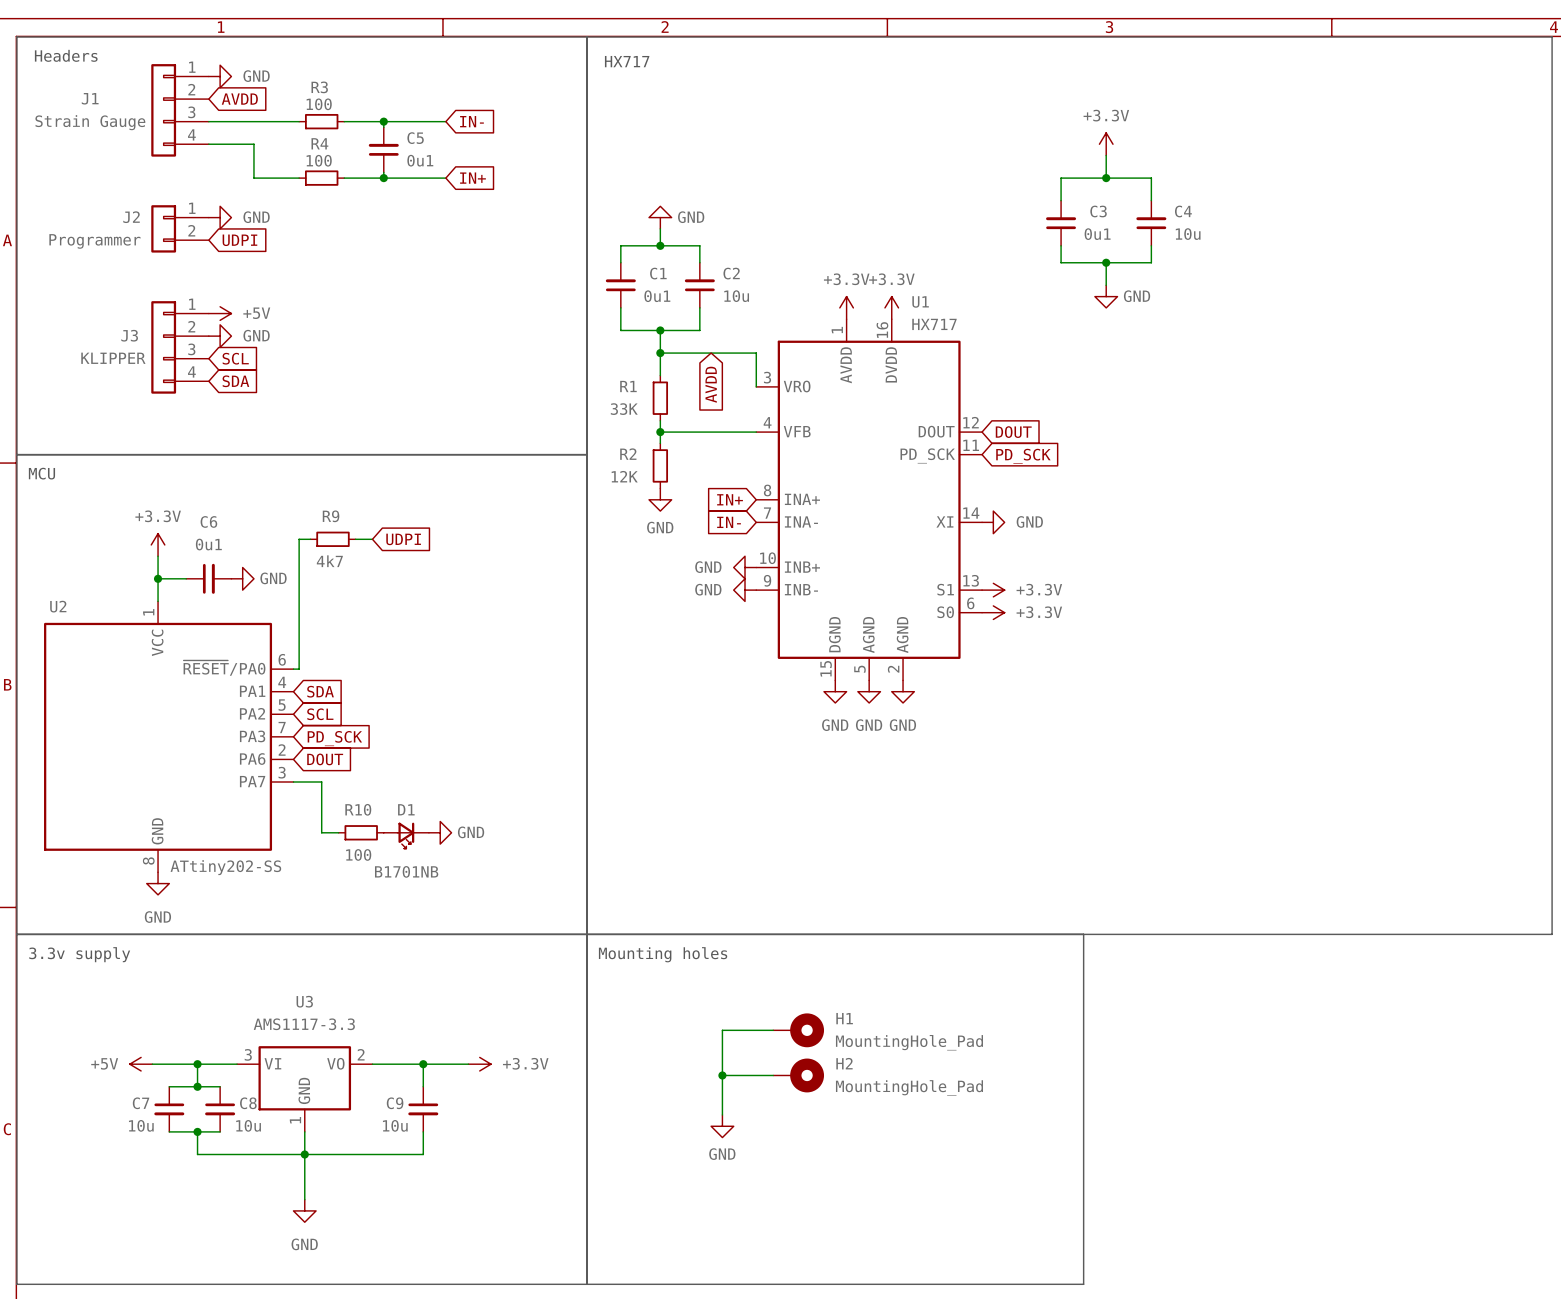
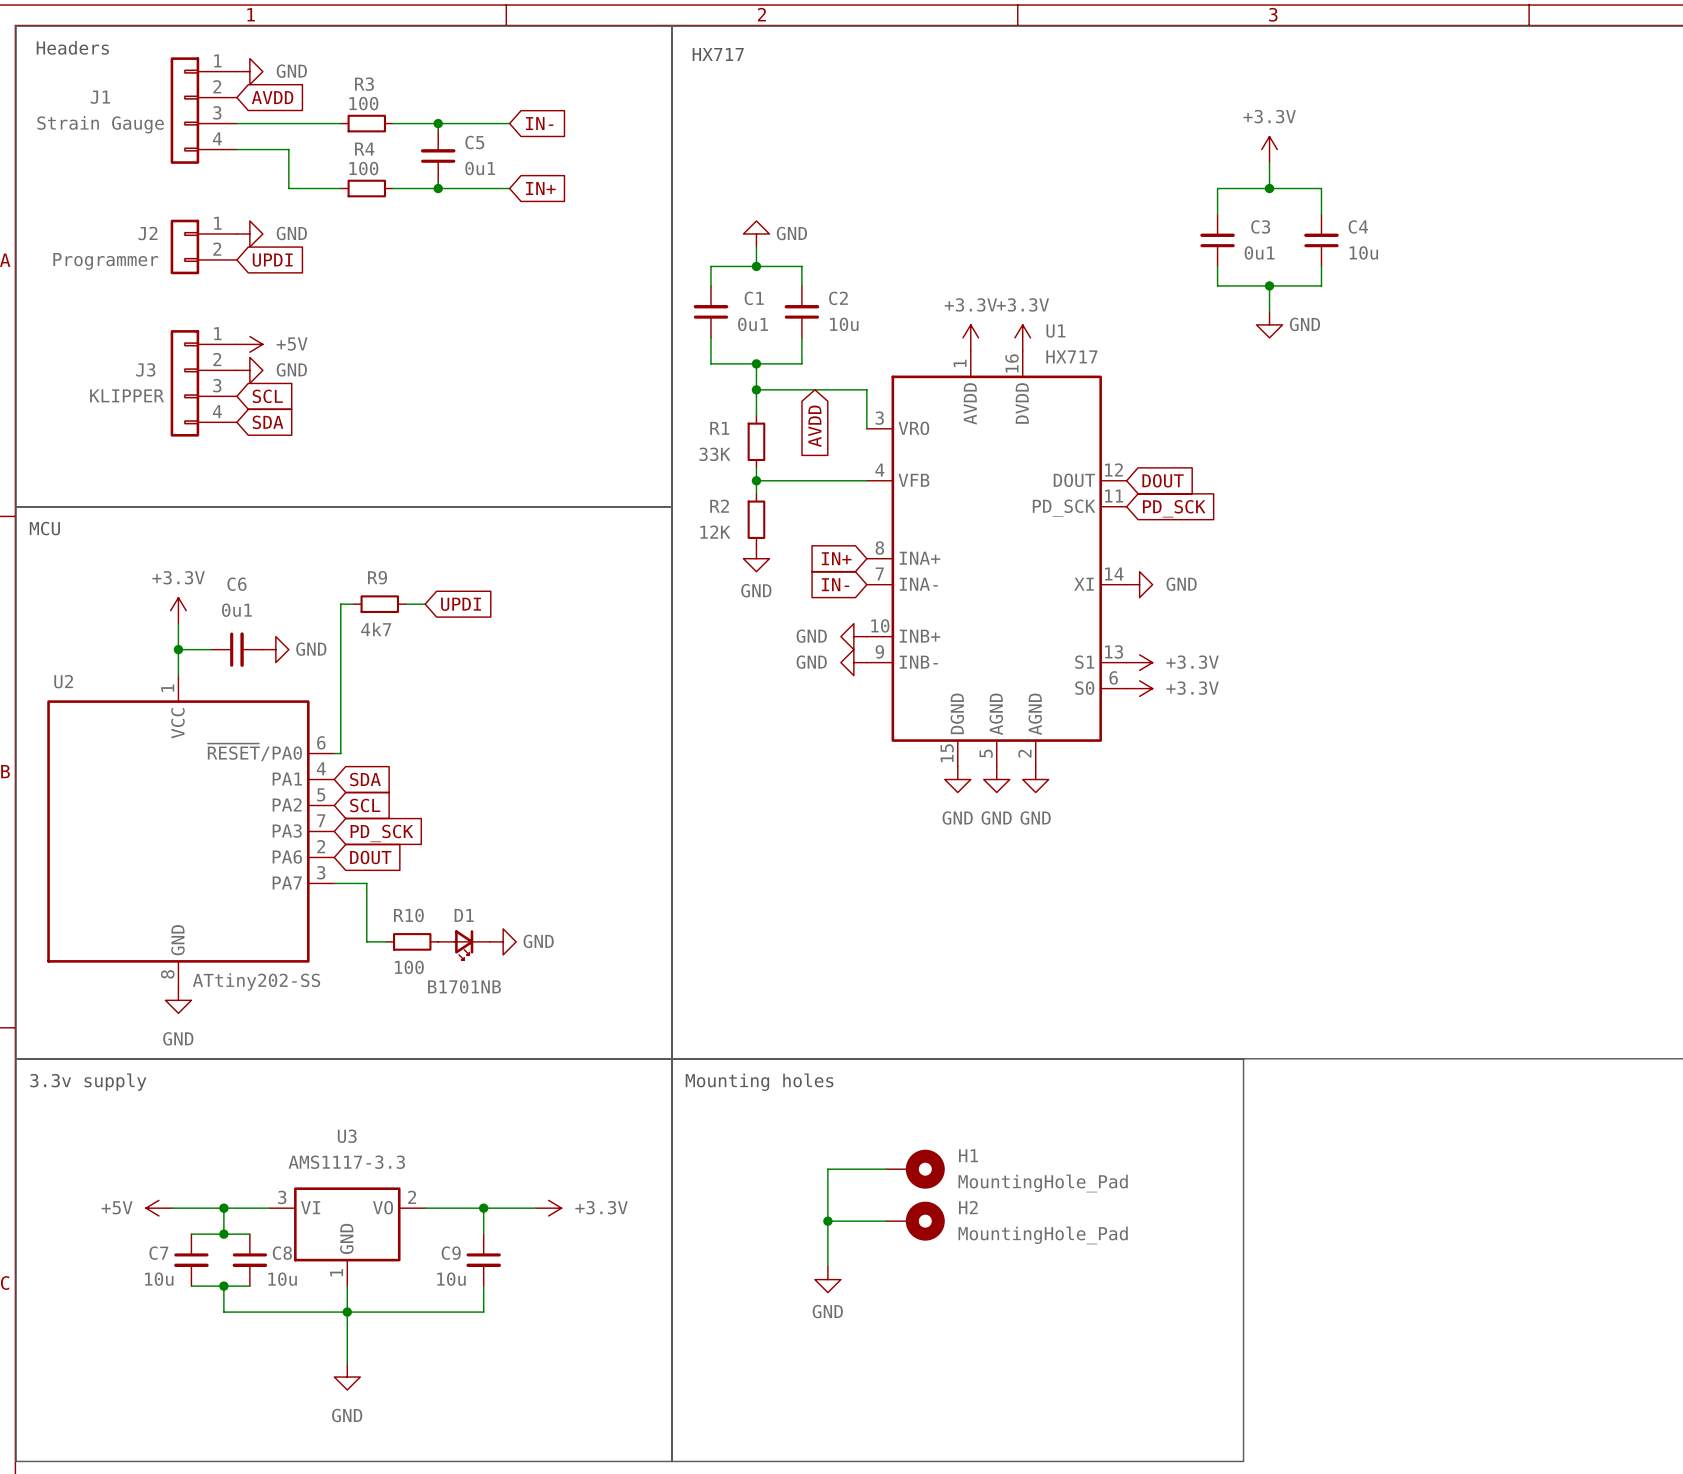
global label: UDPI (239, 240) -> UPDI (272, 260)
global label: UDPI (403, 539) -> UPDI (461, 604)

